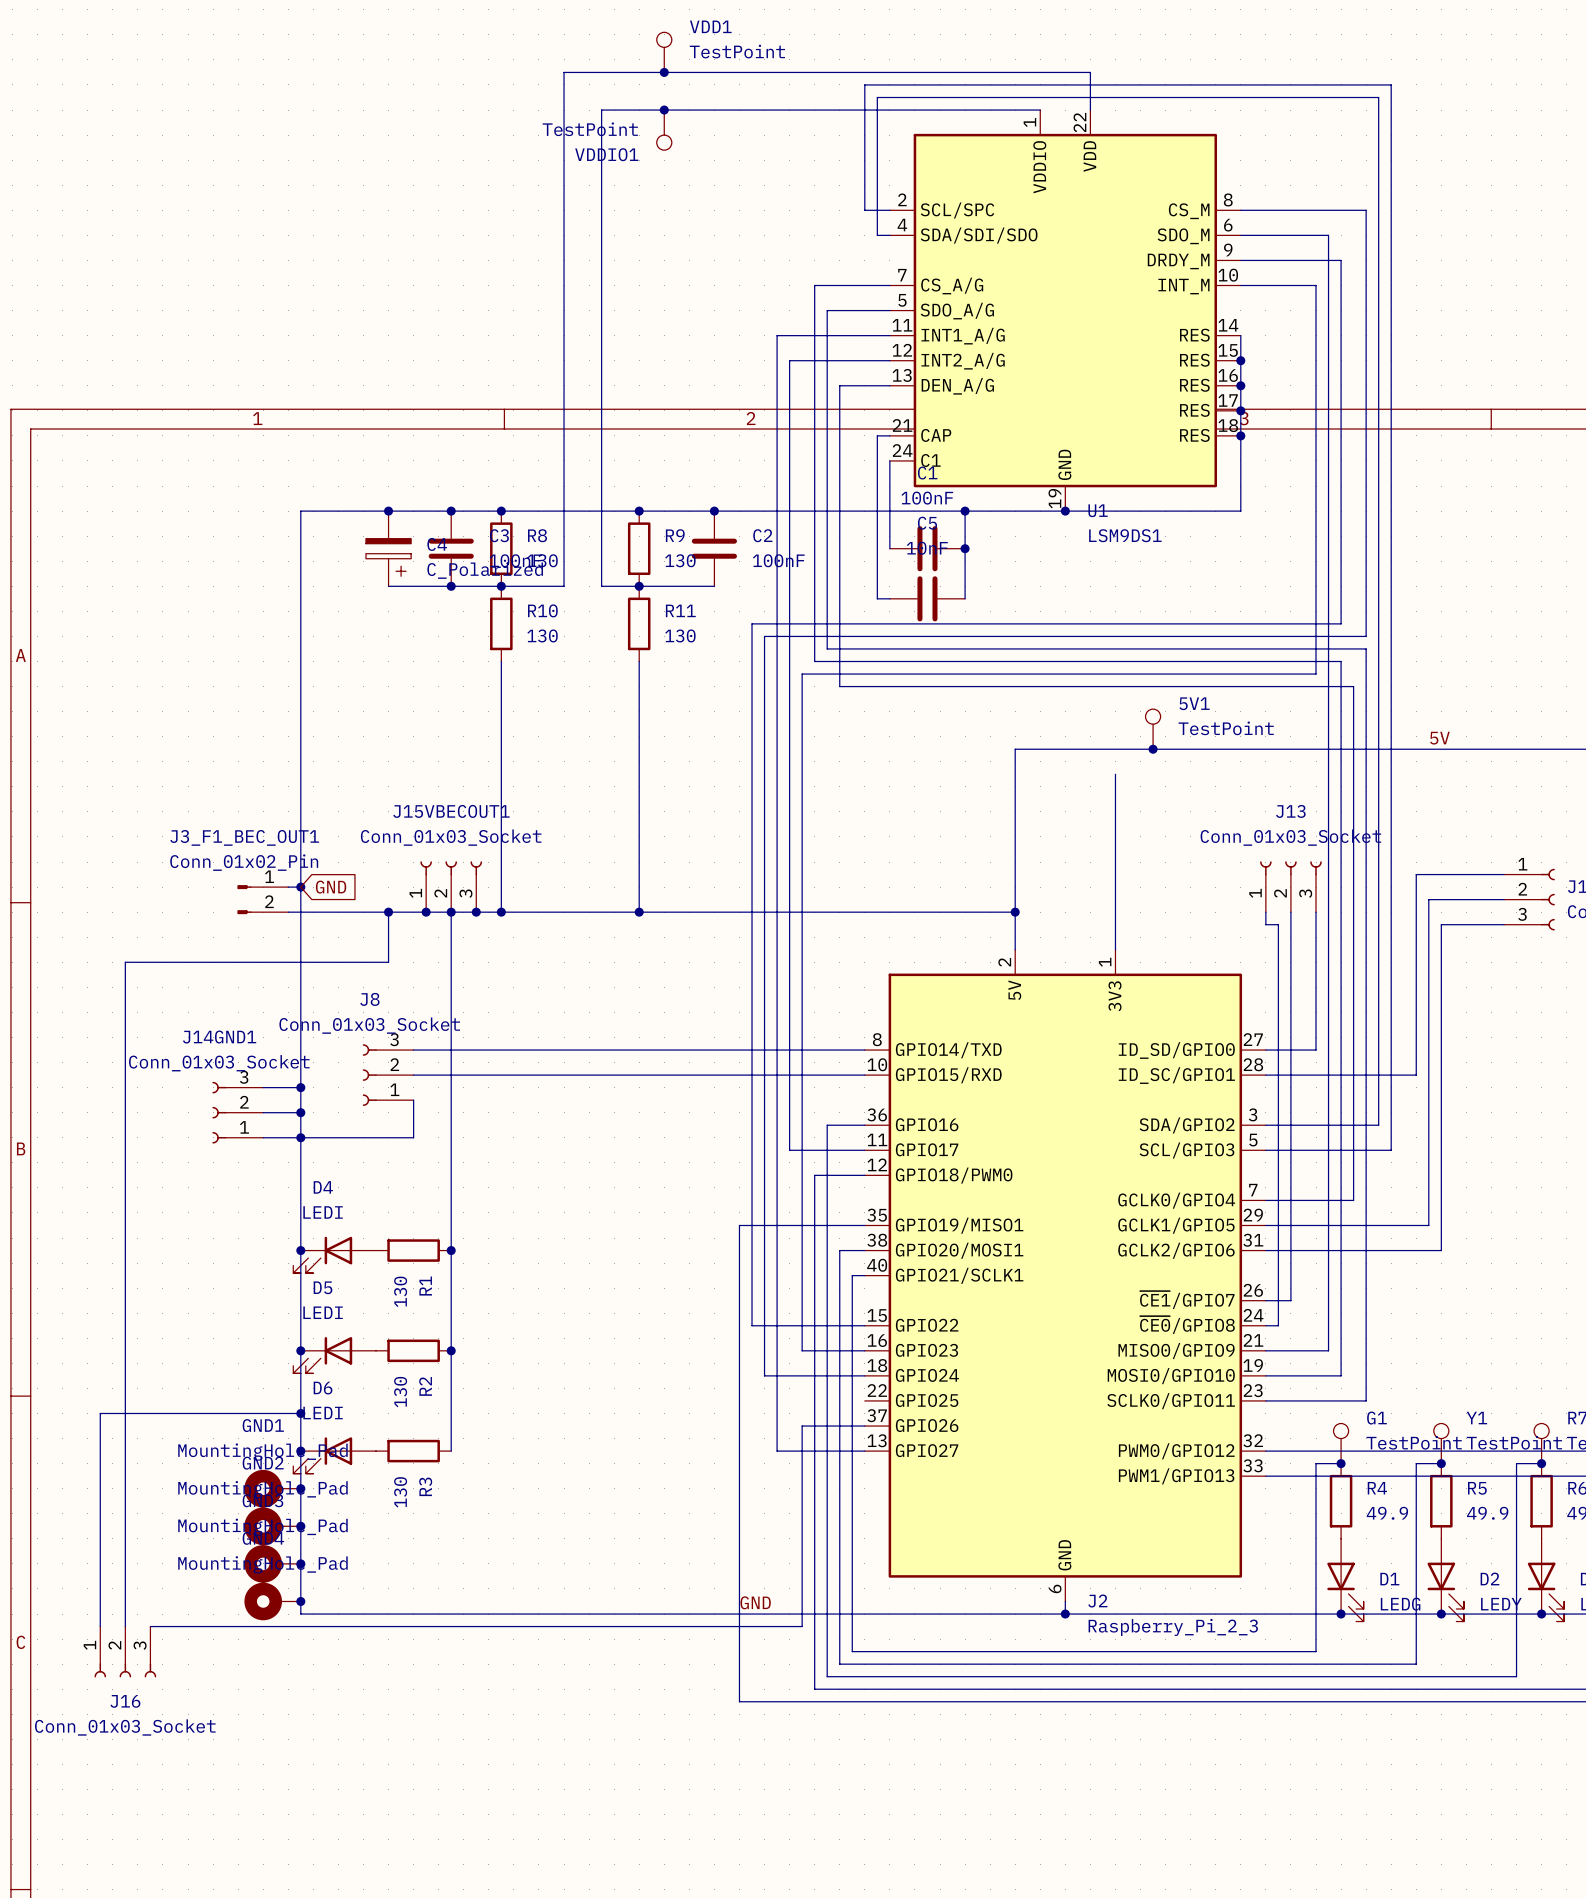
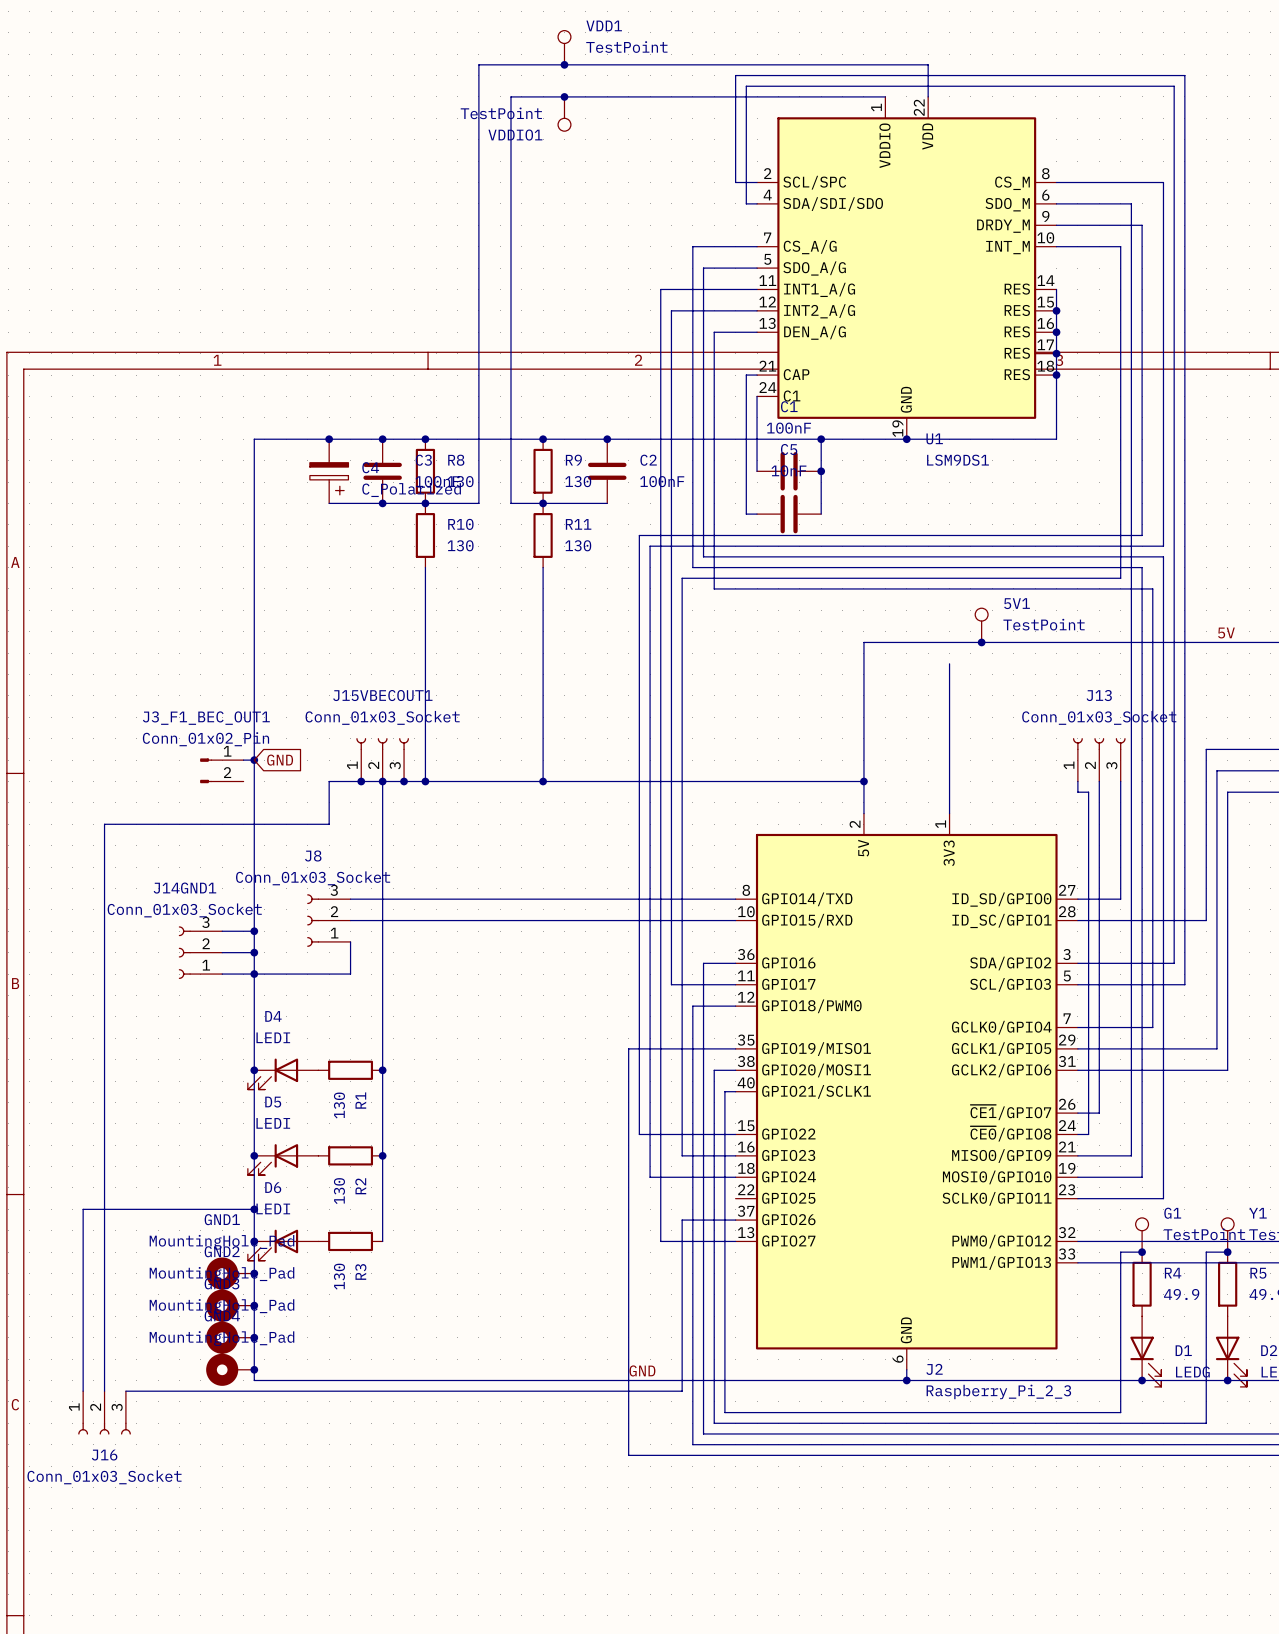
wire: (288, 912) (388, 912) -> none
junction: (388, 912) -> none

